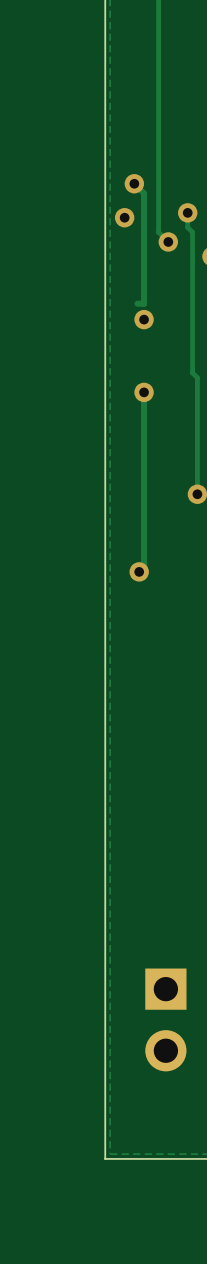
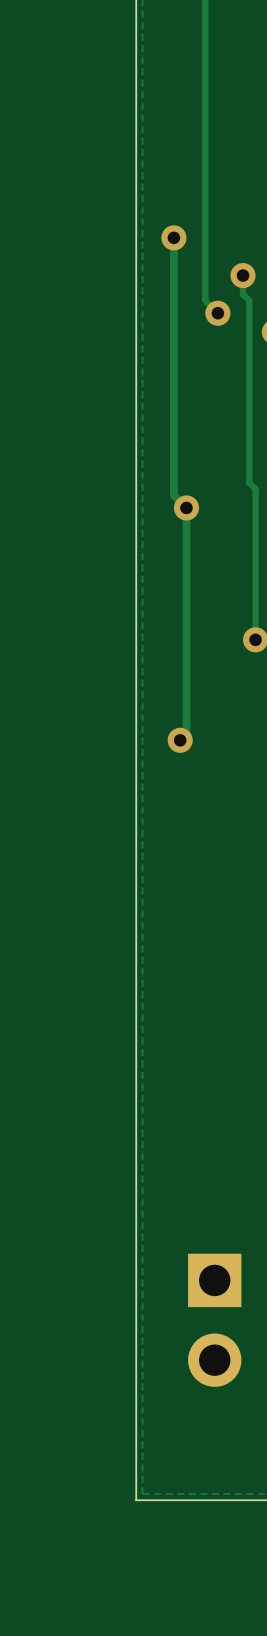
track: (134, 183) (144, 193) (144, 303) (137, 303) -> (173, 237) (173, 495) (180, 501)
via: (124, 217) -> none
via: (144, 319) -> none

